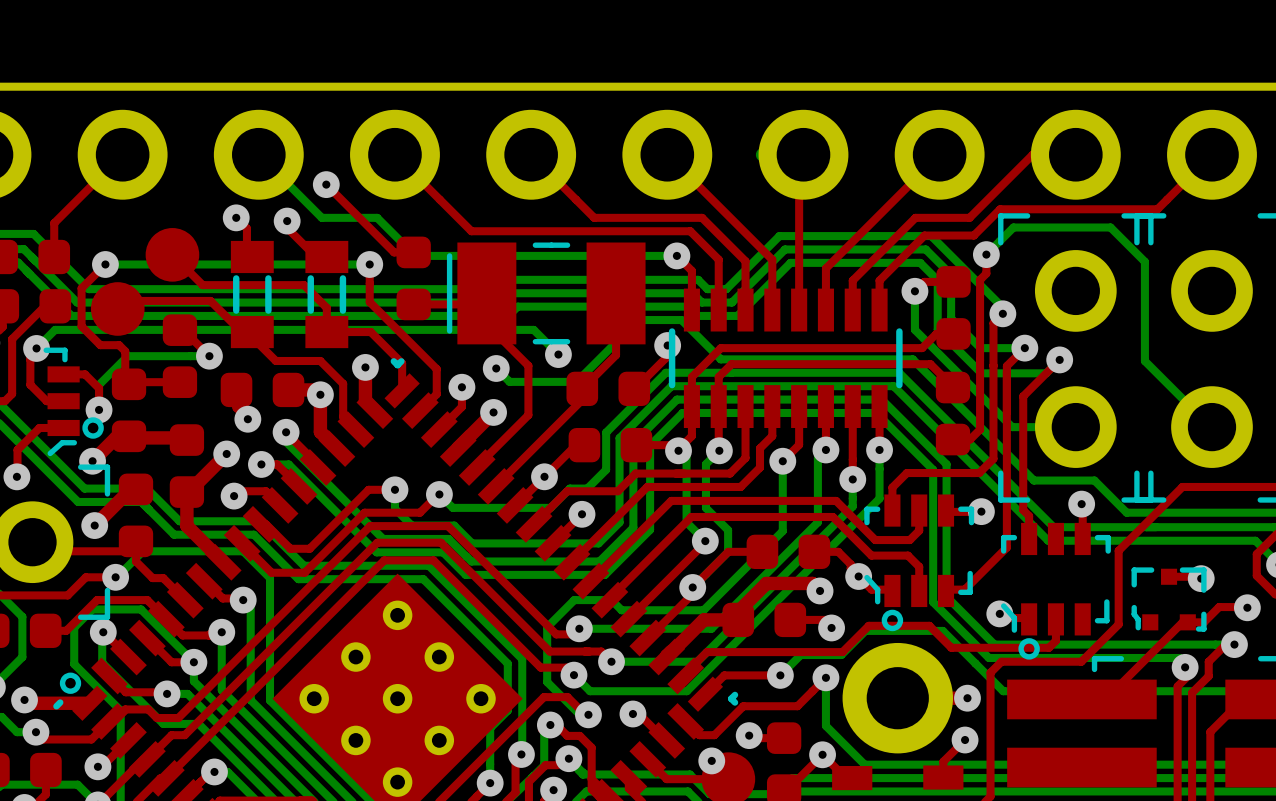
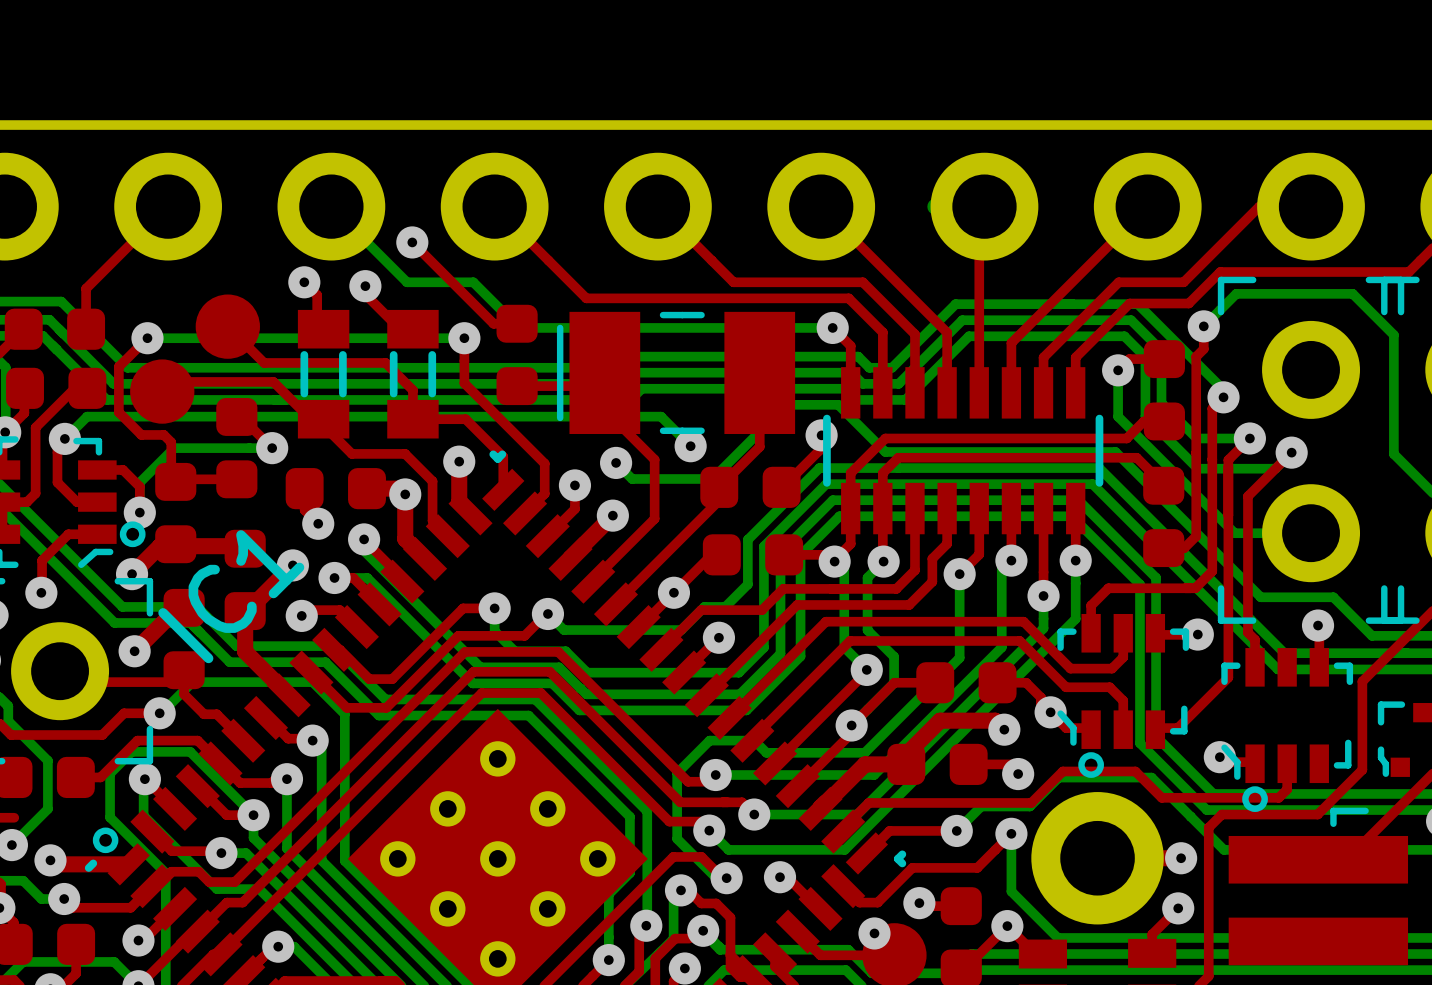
IC1 name: none -> IC1 (231, 596)

